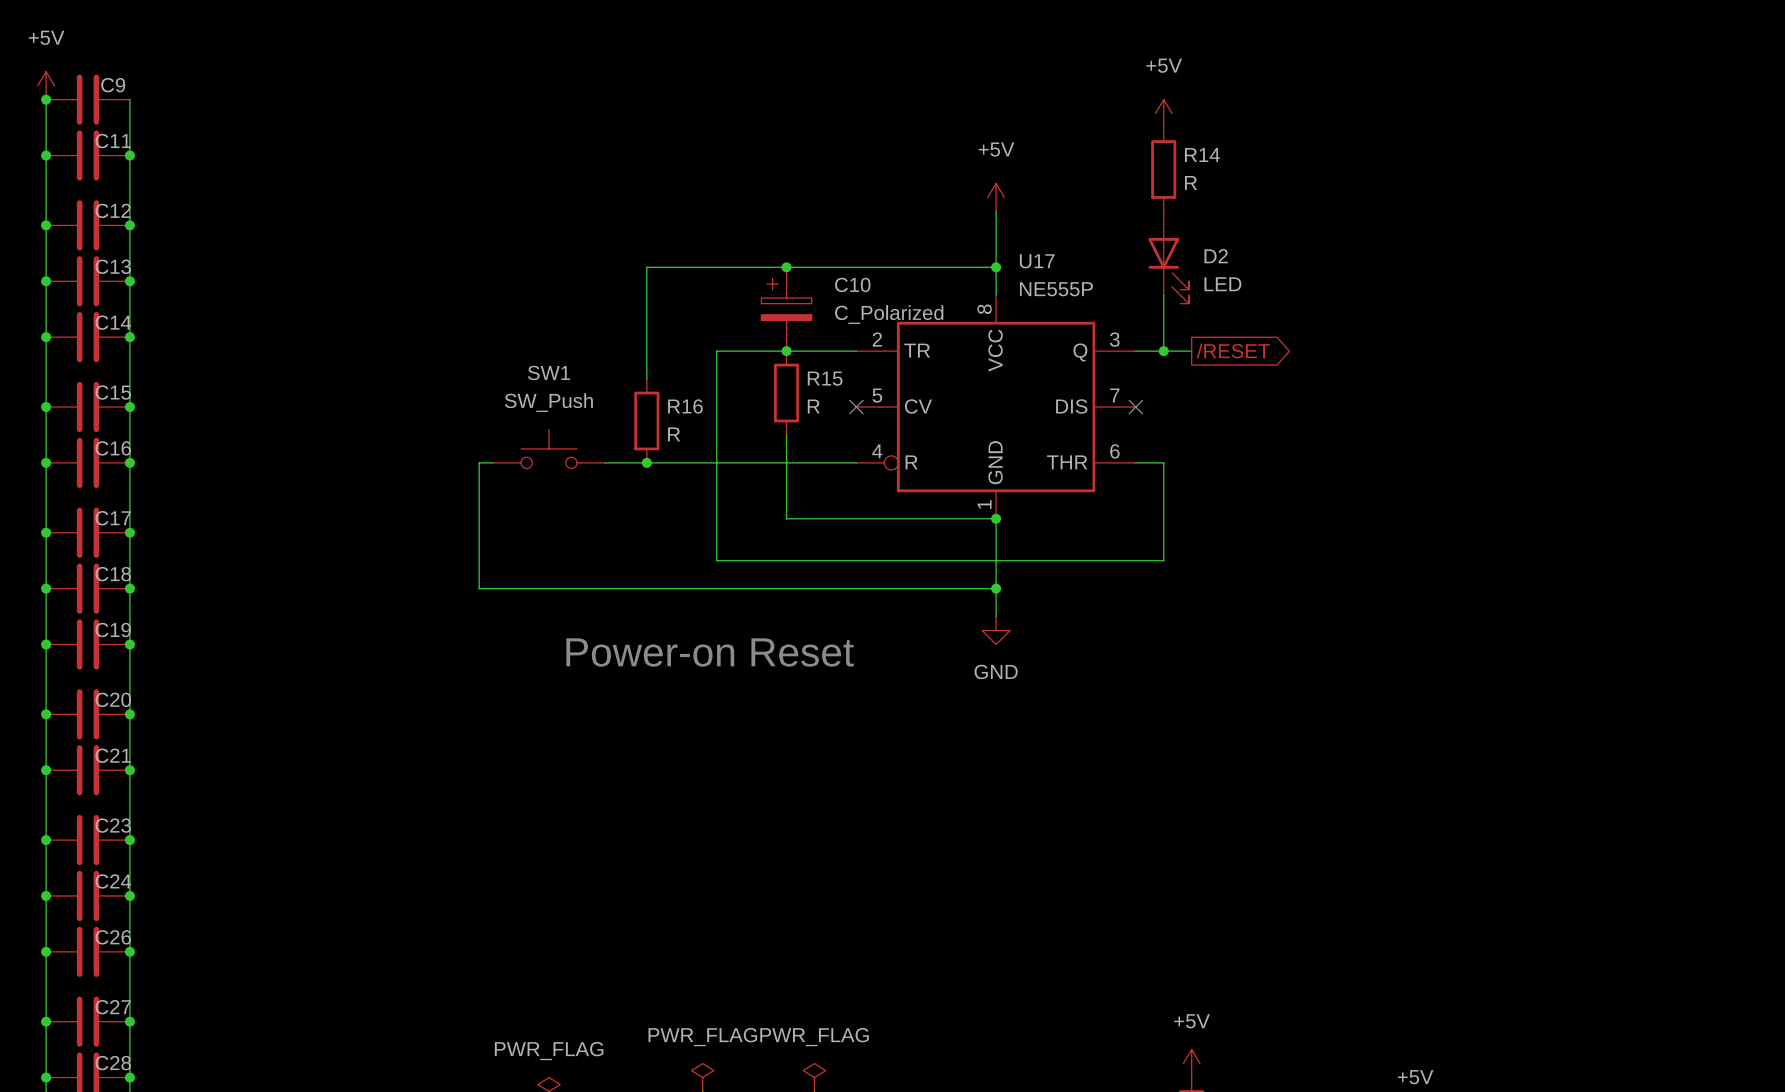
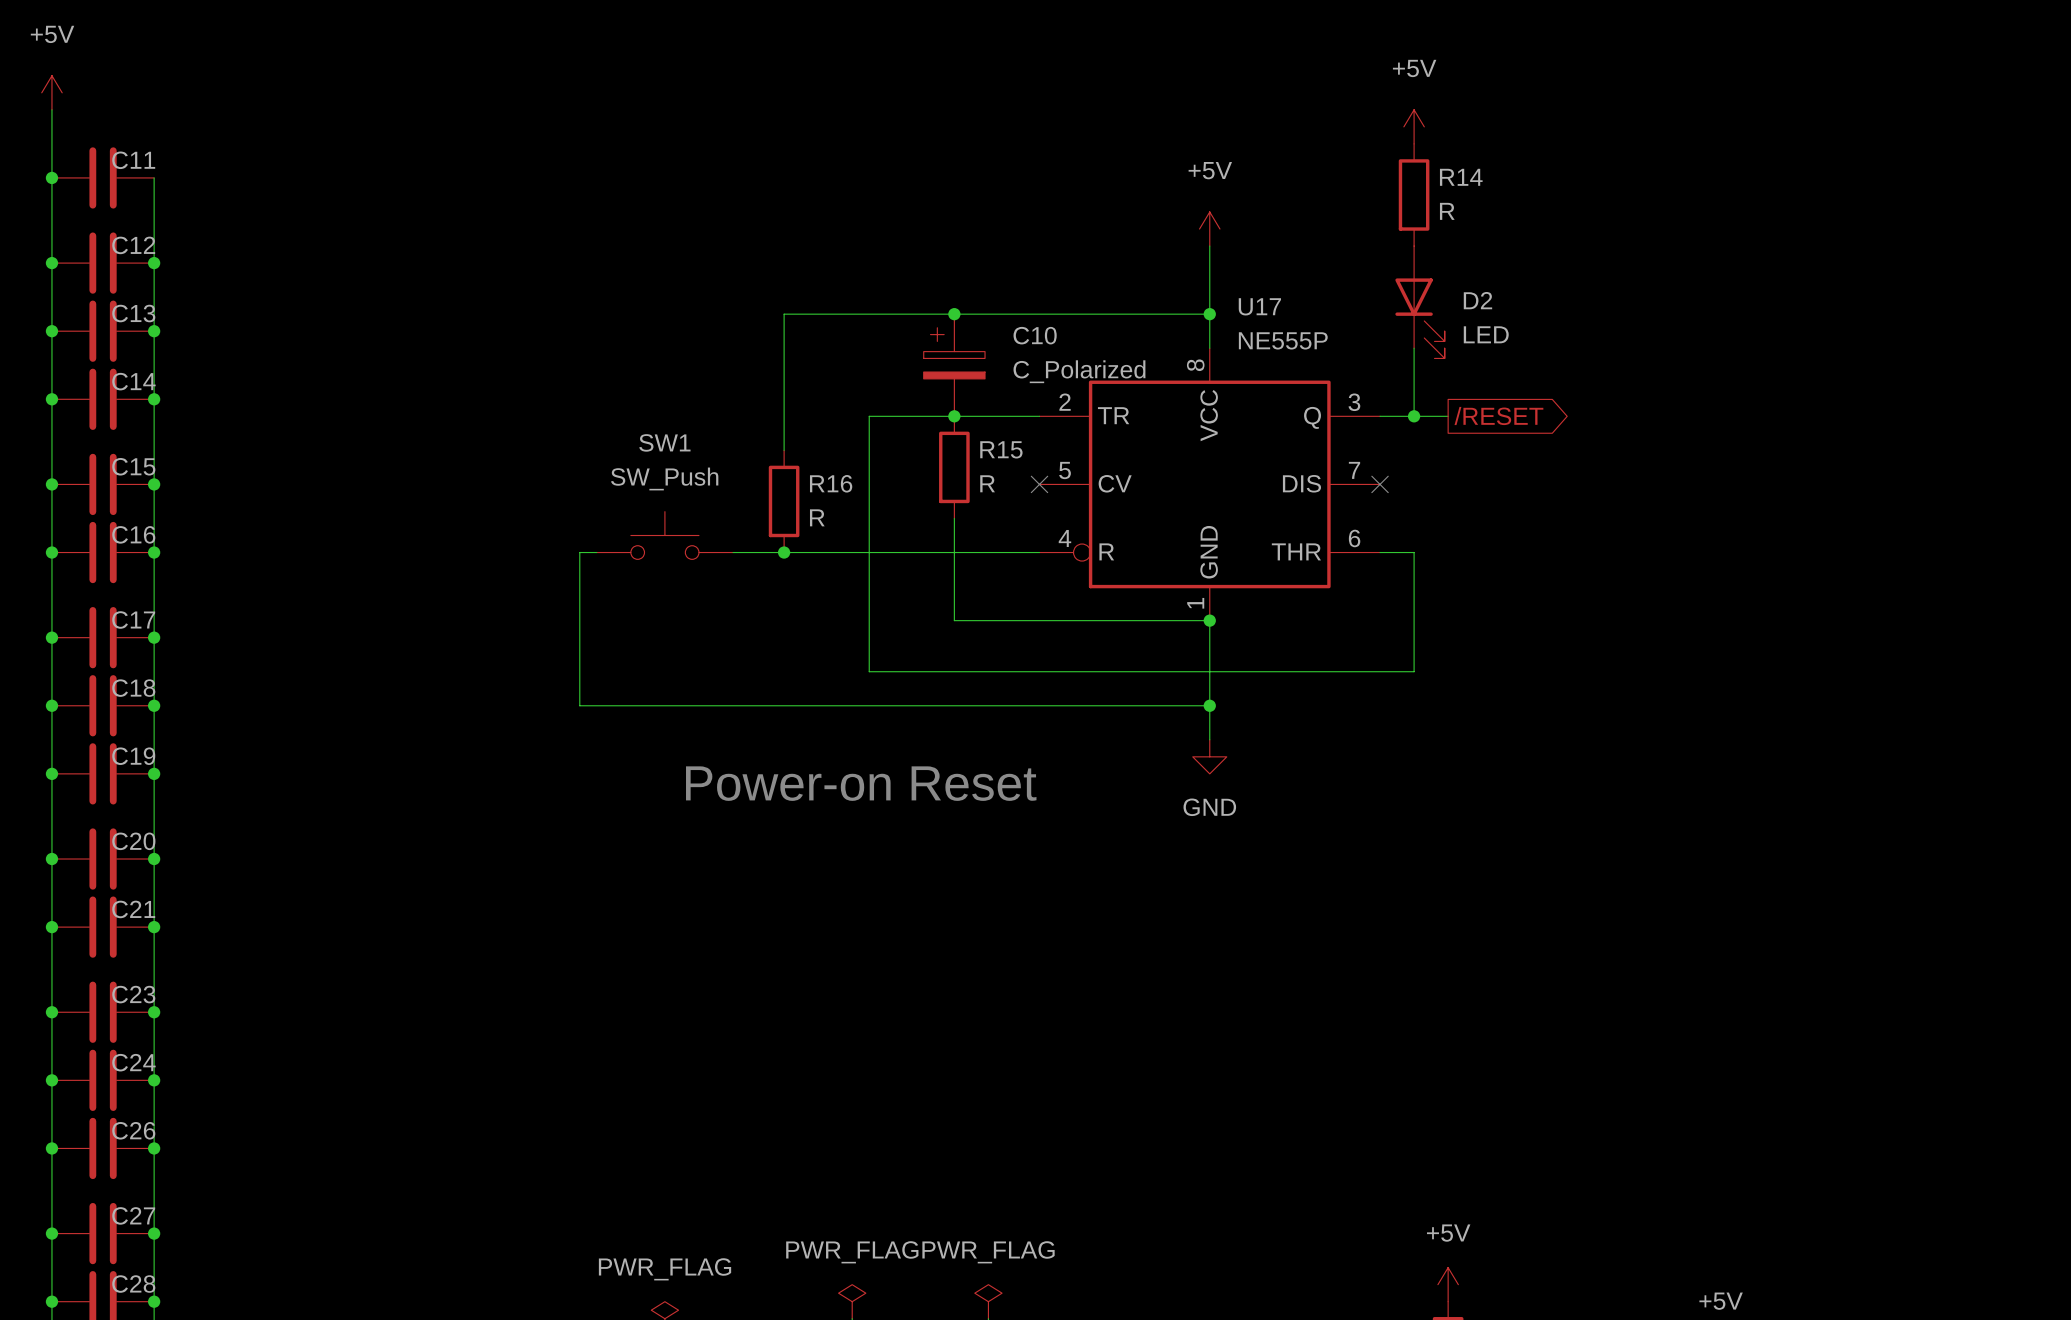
junction: (46, 99) -> none
C9: (88, 99) -> none
wire: (129, 99) (129, 155) -> none
junction: (129, 155) -> none

